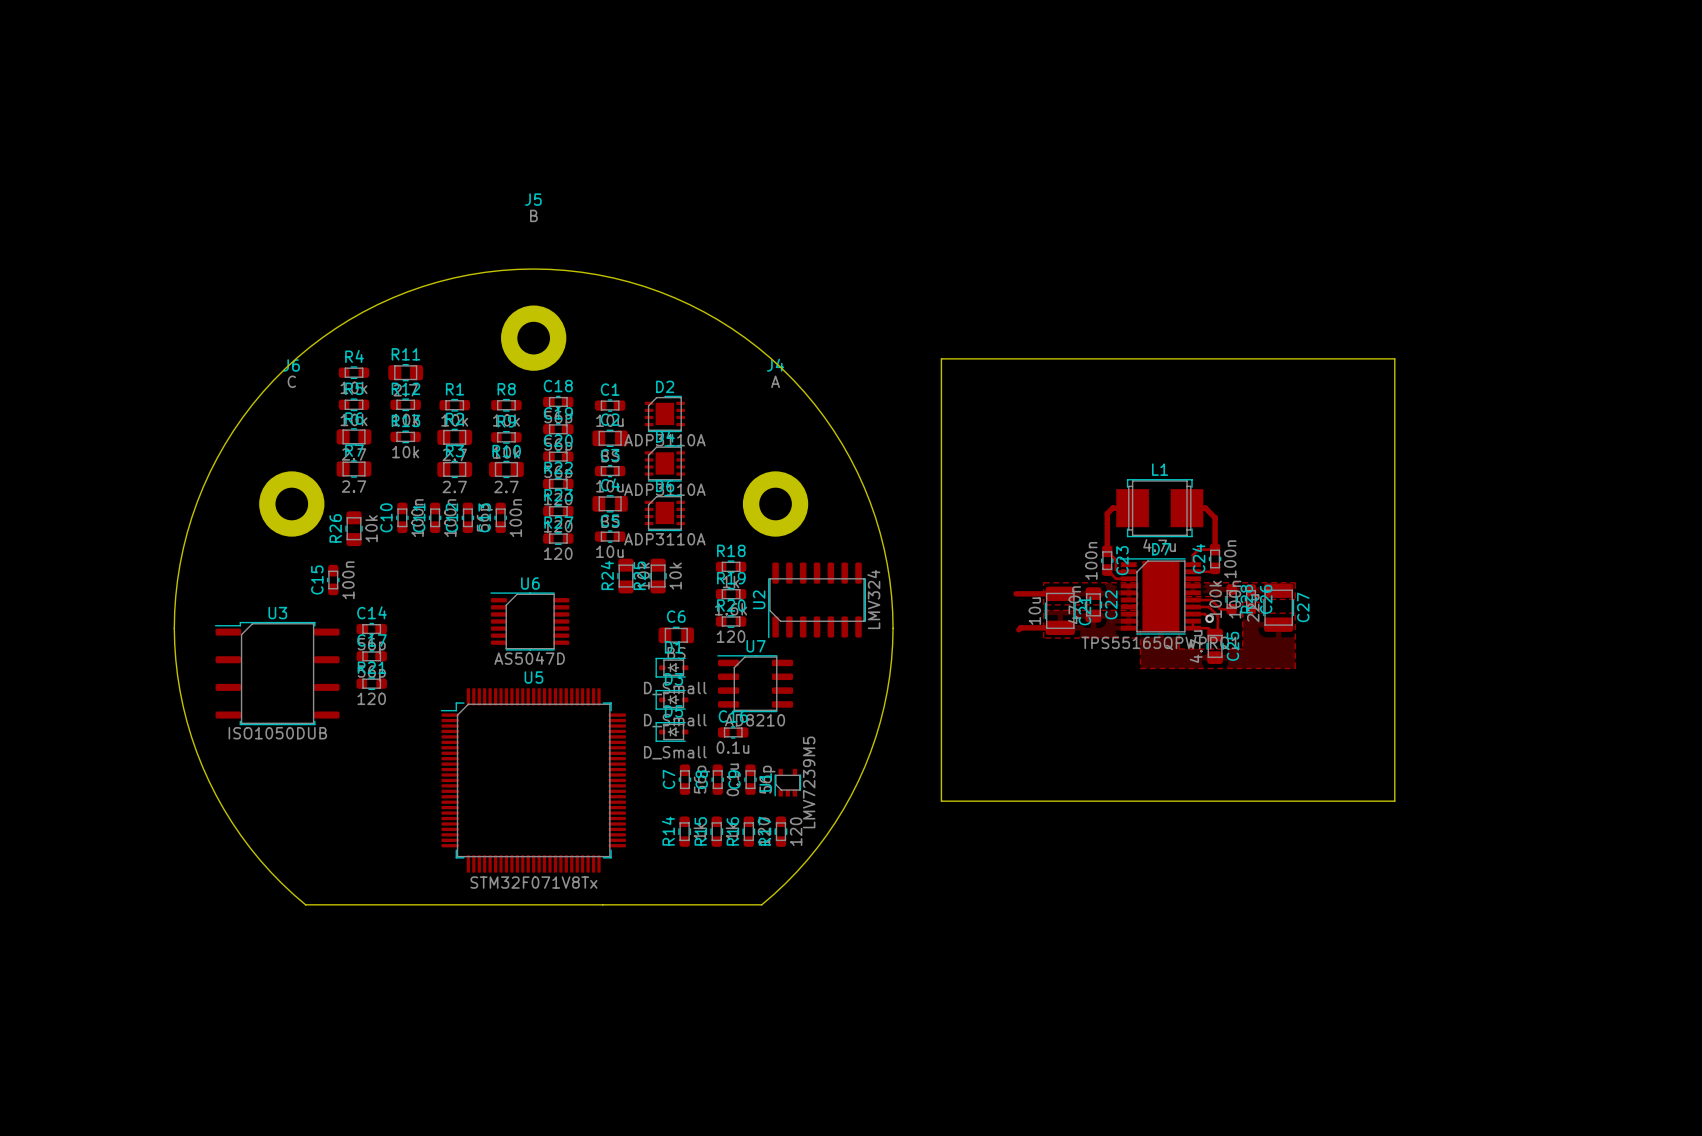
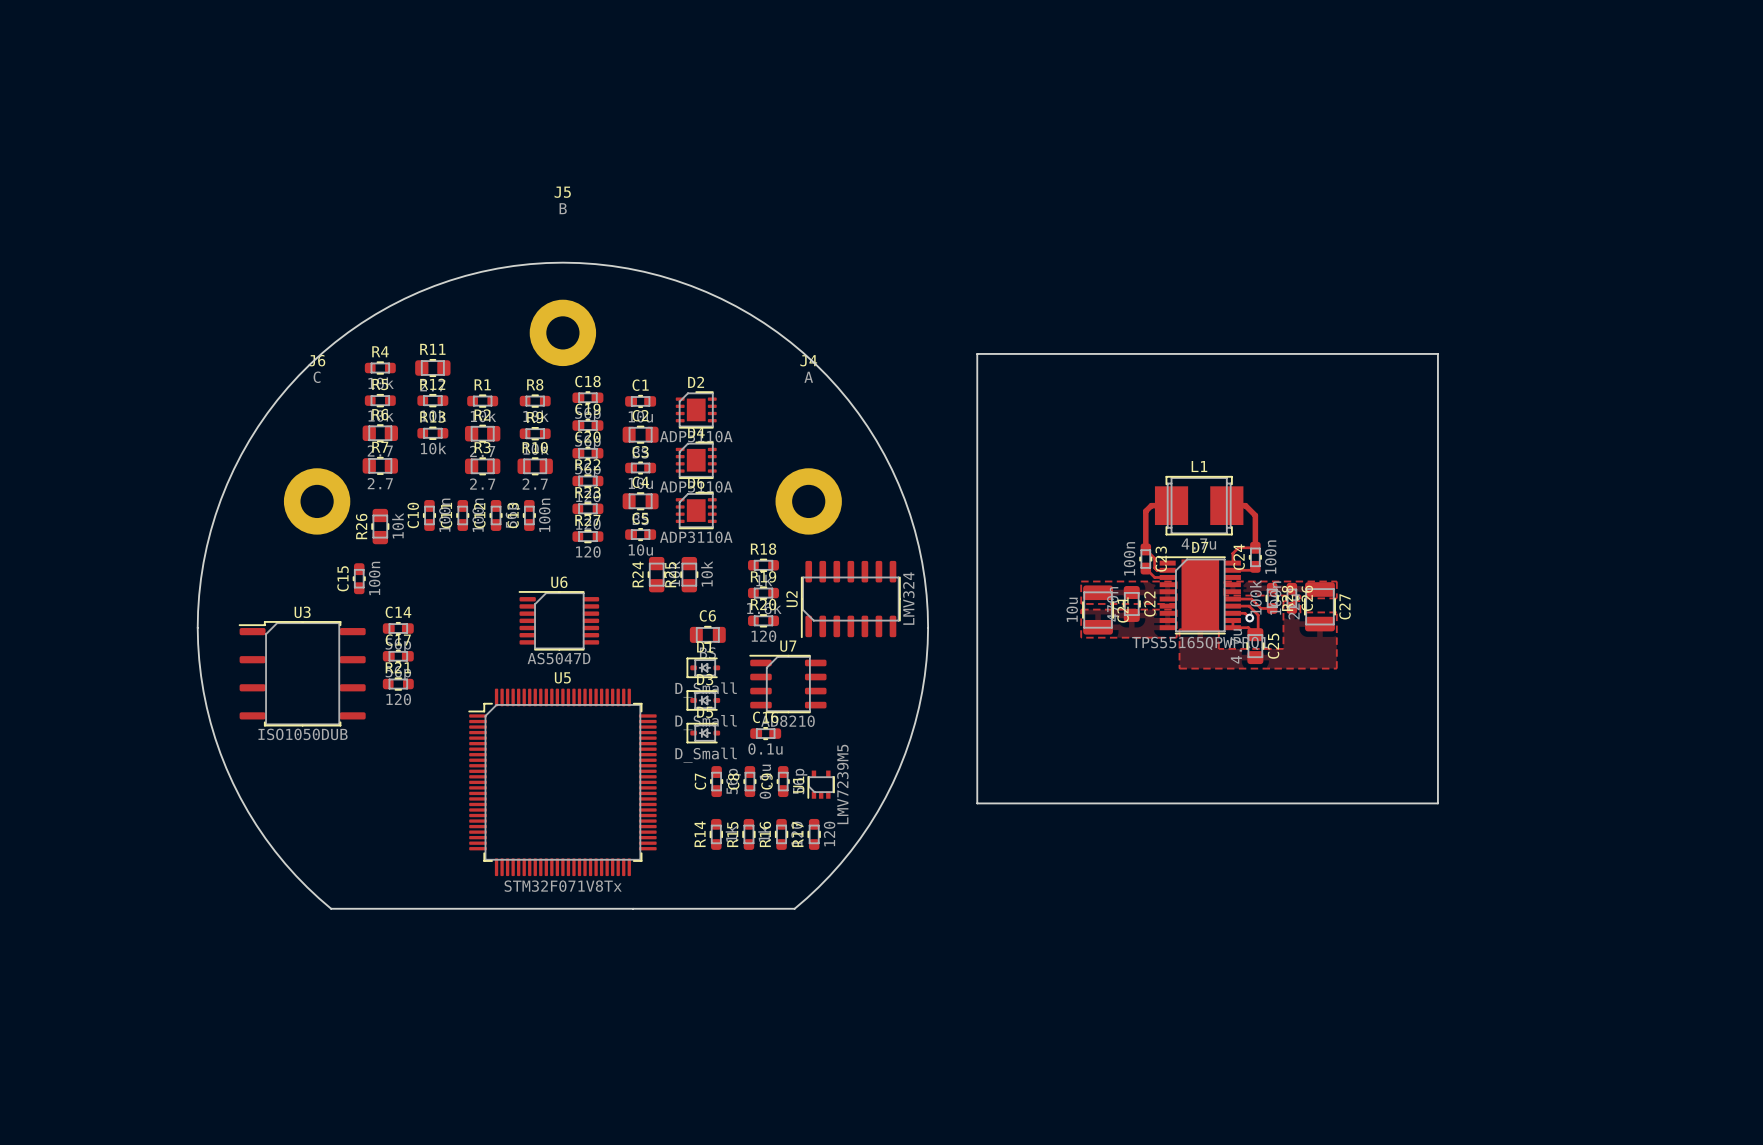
track: (1016, 593) (1060, 593) -> none
track: (1060, 627) (1020, 627) (1018, 629) -> none

